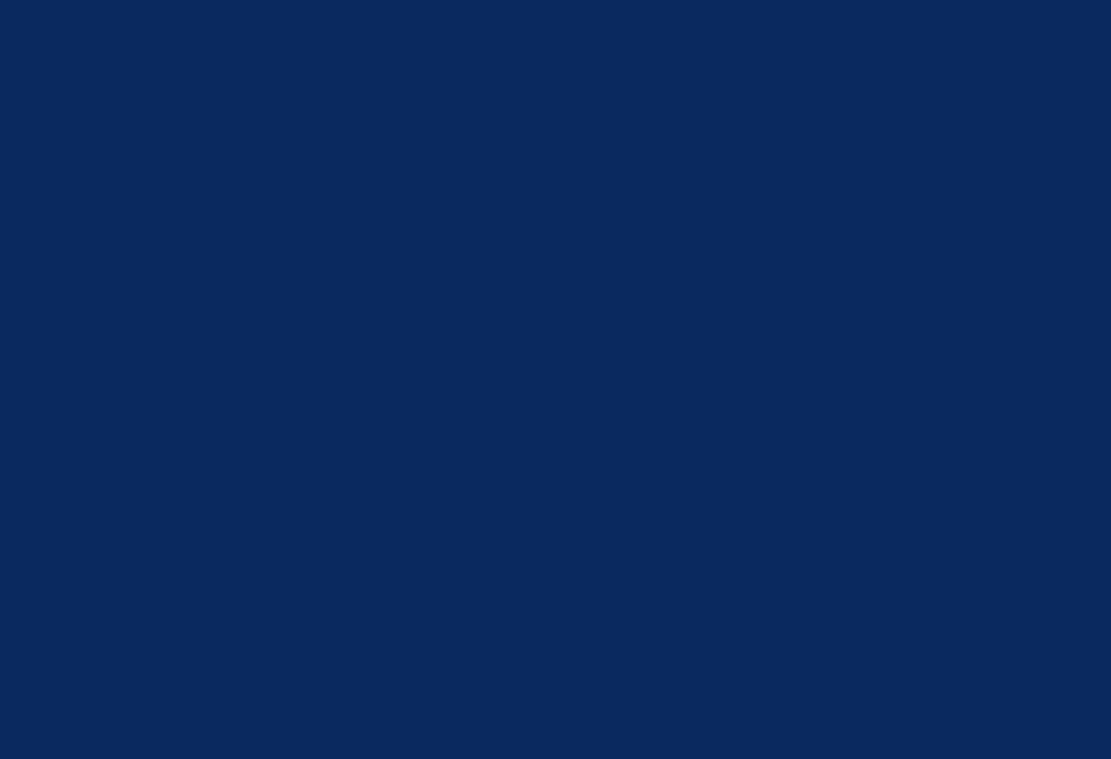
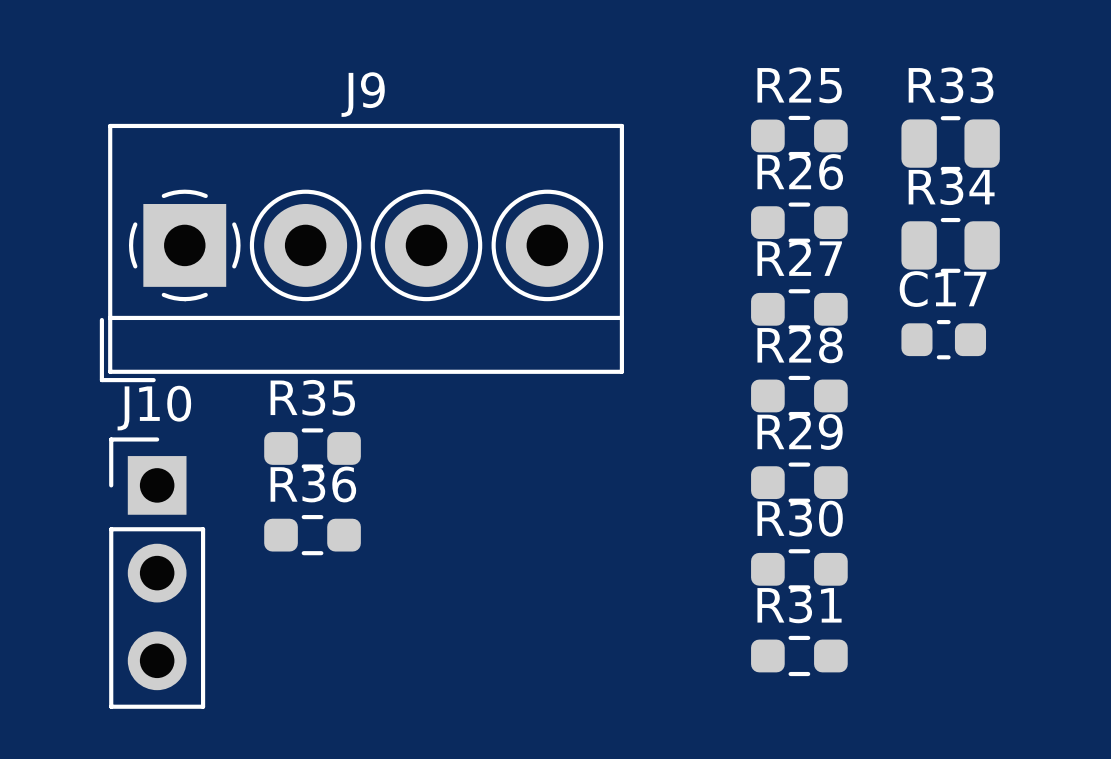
R25: none -> (799, 135)
R33: none -> (950, 143)
R26: none -> (799, 222)
R34: none -> (950, 245)
J9: none -> (361, 253)
R27: none -> (799, 309)
C17: none -> (943, 339)
R28: none -> (799, 395)
R35: none -> (312, 448)
R29: none -> (799, 482)
R36: none -> (312, 535)
R30: none -> (799, 569)
J10: none -> (157, 573)
R31: none -> (799, 655)

